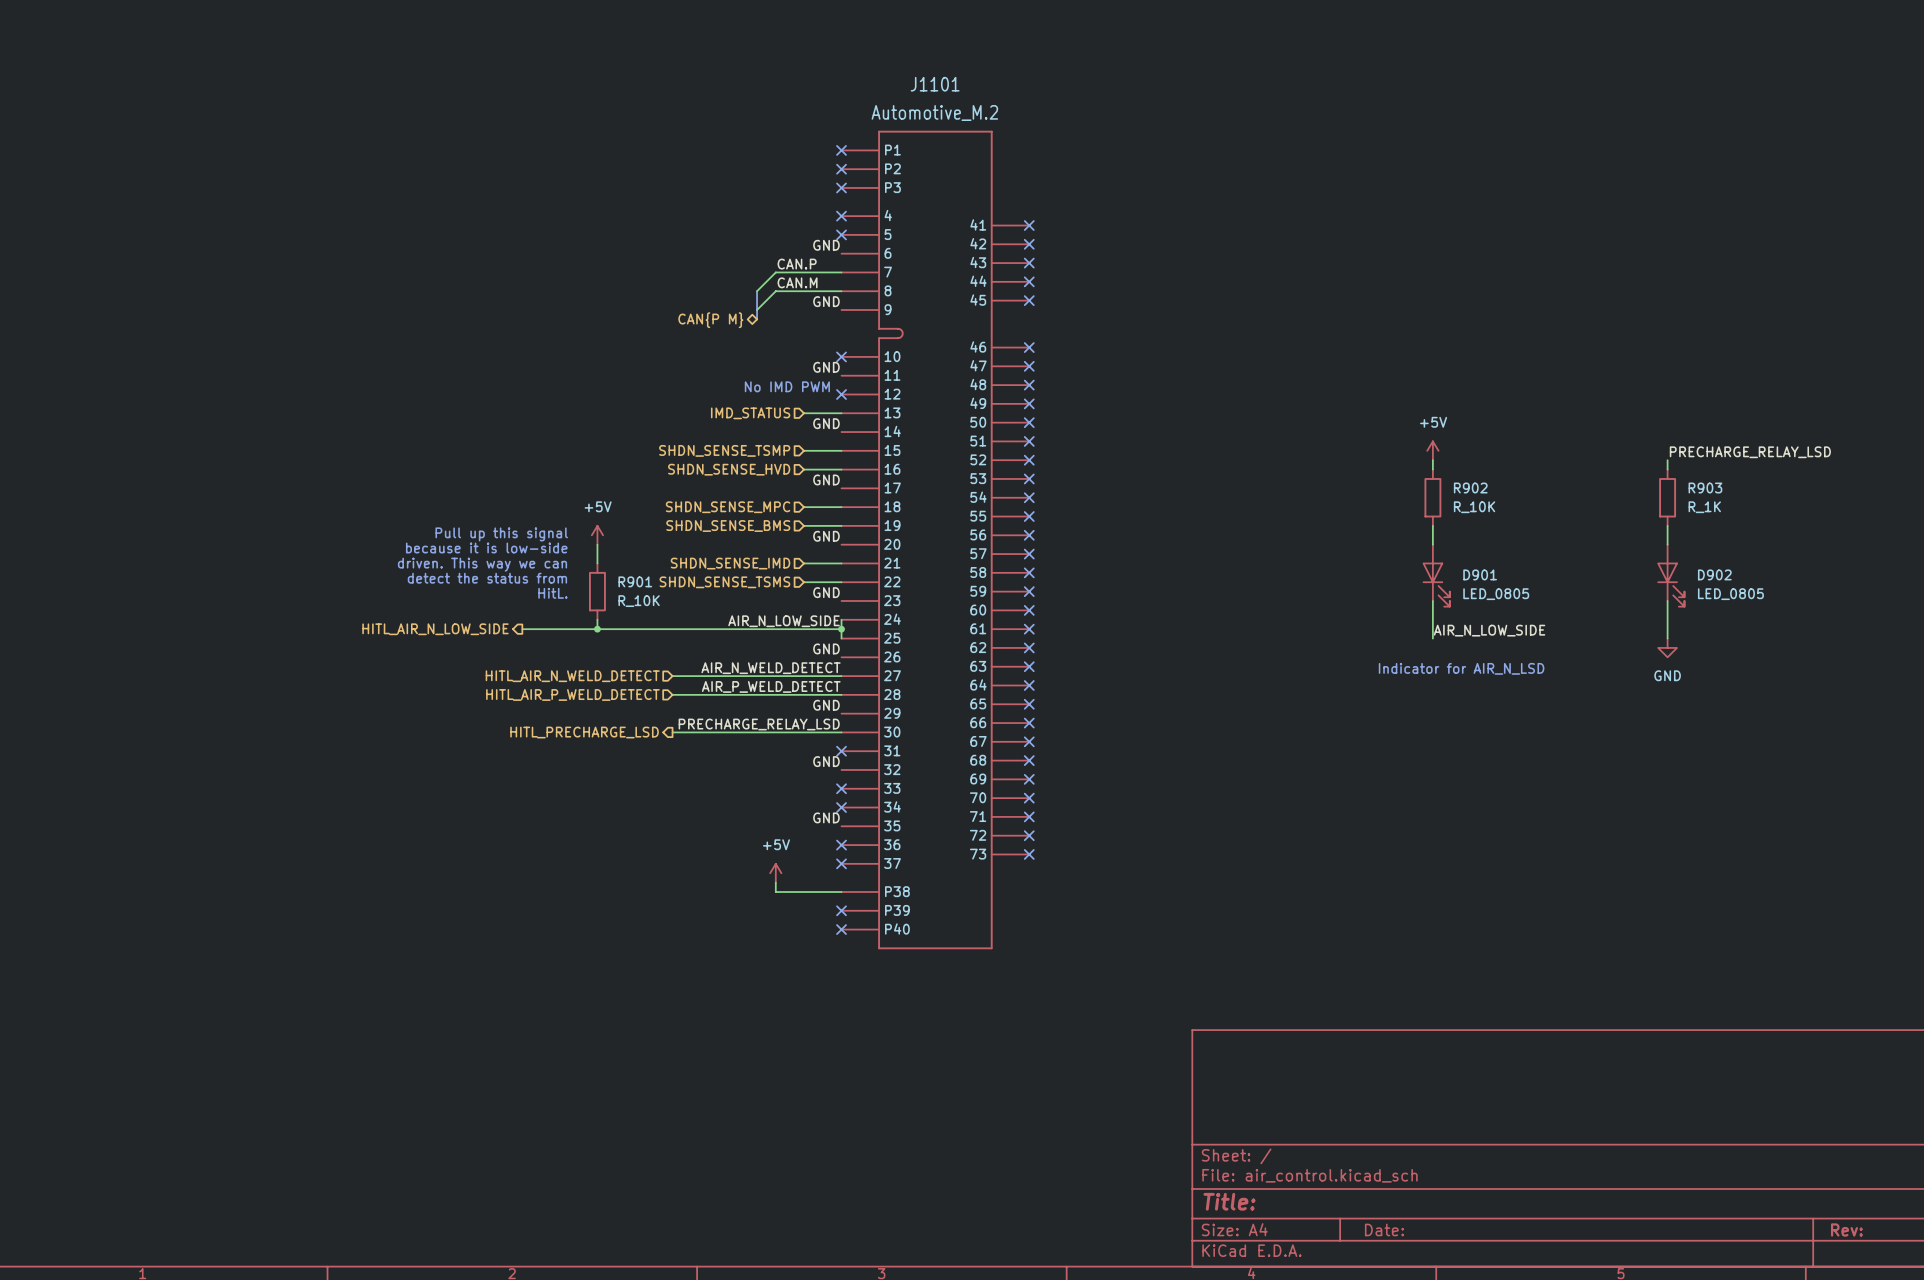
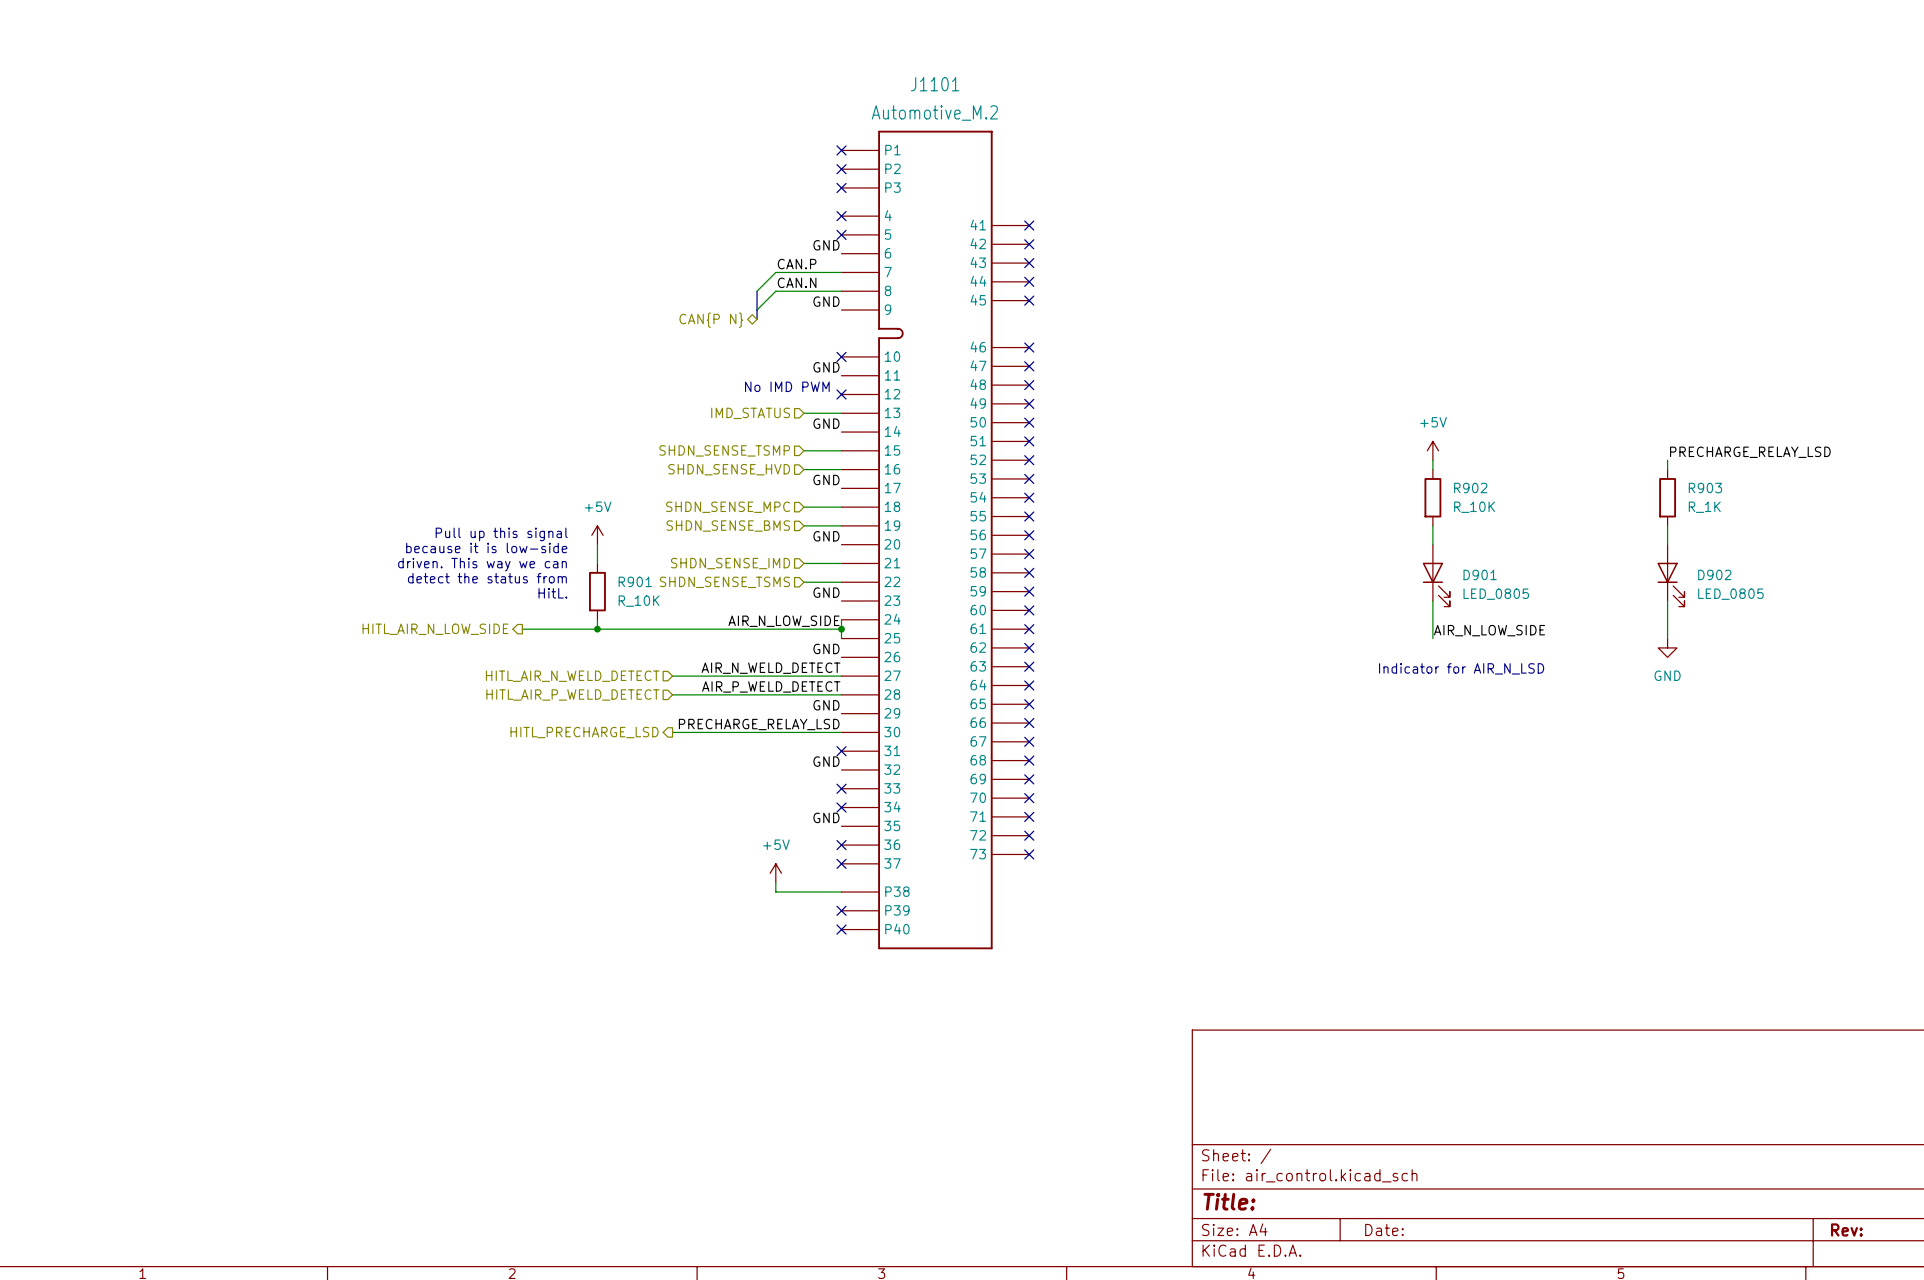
label: CAN.M (797, 282) -> CAN.N (797, 282)
hierarchical label: CAN{P M} (710, 320) -> CAN{P N} (711, 320)

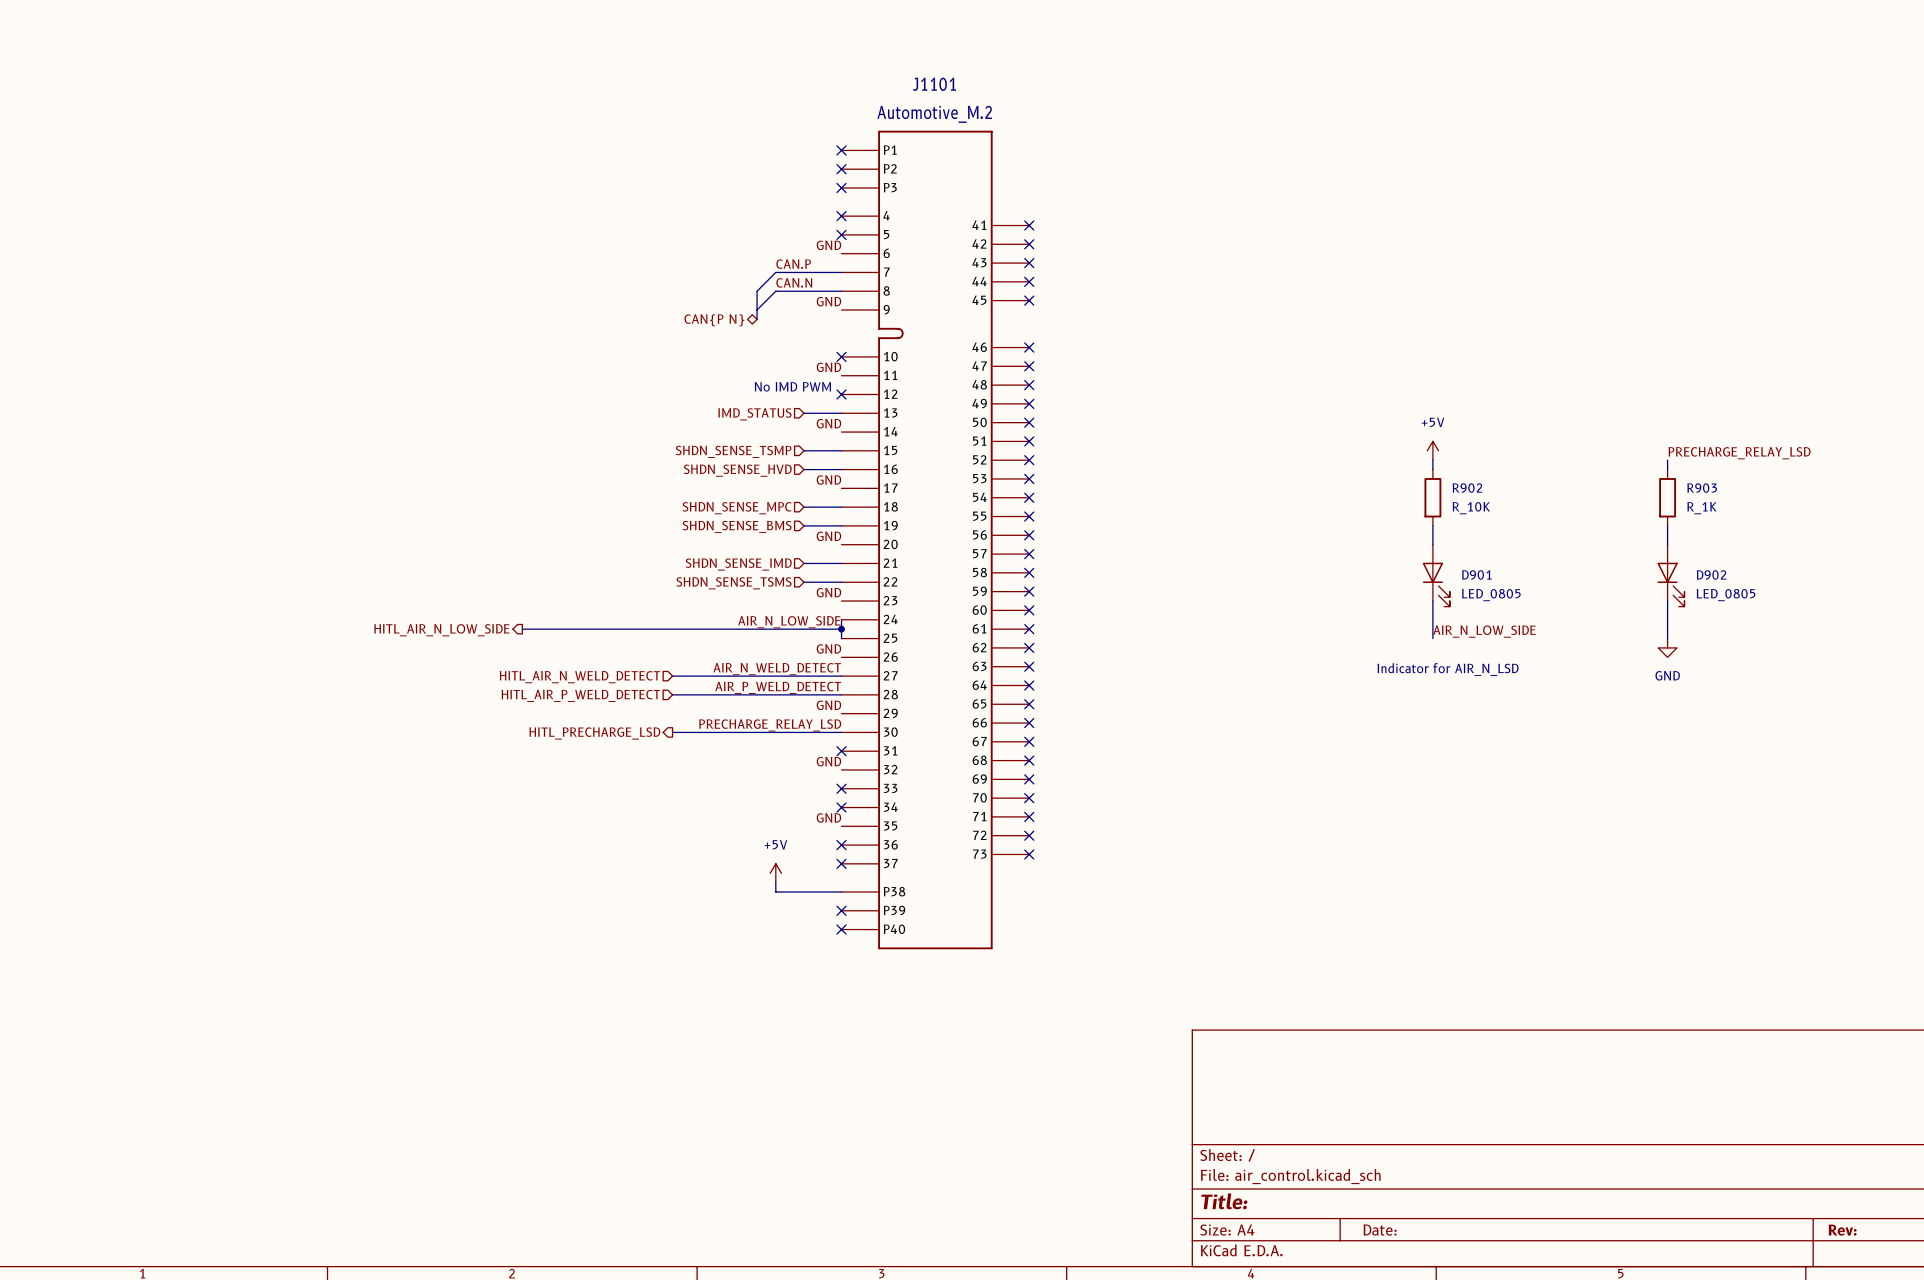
text: Pull up this signal (501, 534) -> none
power symbol: +5V (597, 535) -> none
wire: (597, 544) (597, 563) -> none
text: because it is low-side (486, 547) -> none
text: driven. This way we can (482, 564) -> none
text: detect the status from (487, 578) -> none
R901: R_10K (597, 591) -> none
text: HitL. (552, 593) -> none
wire: (597, 619) (597, 629) -> none
junction: (597, 629) -> none

